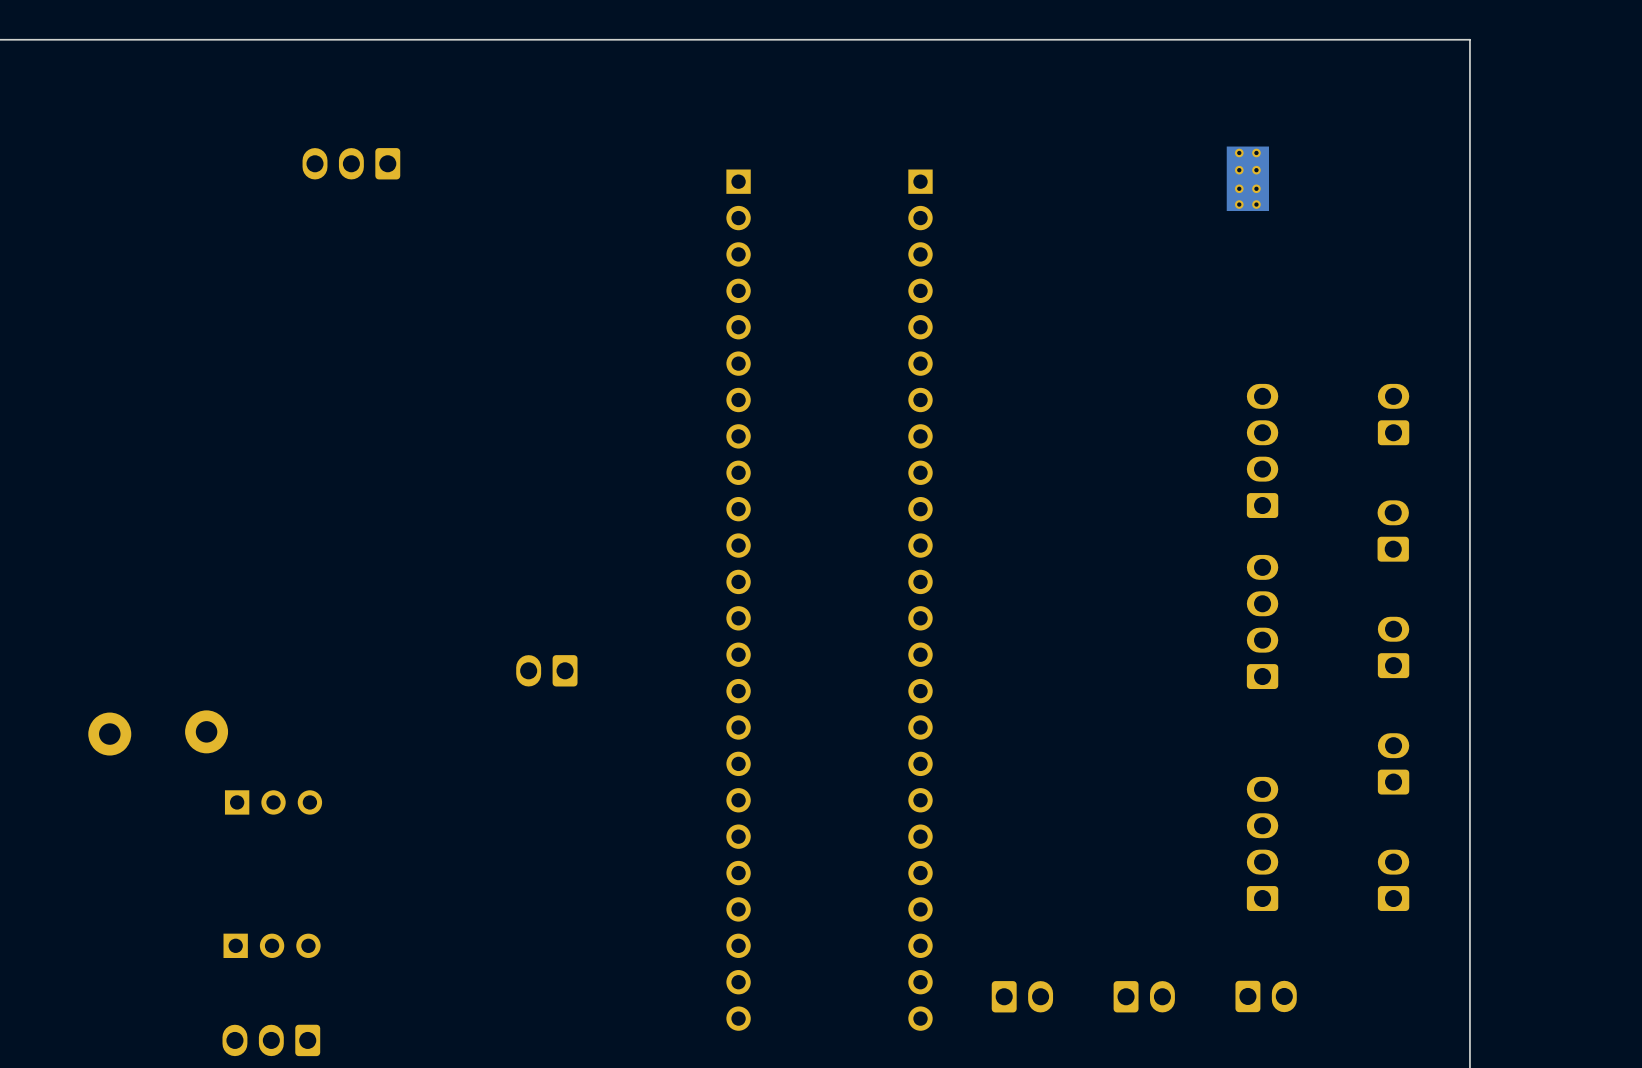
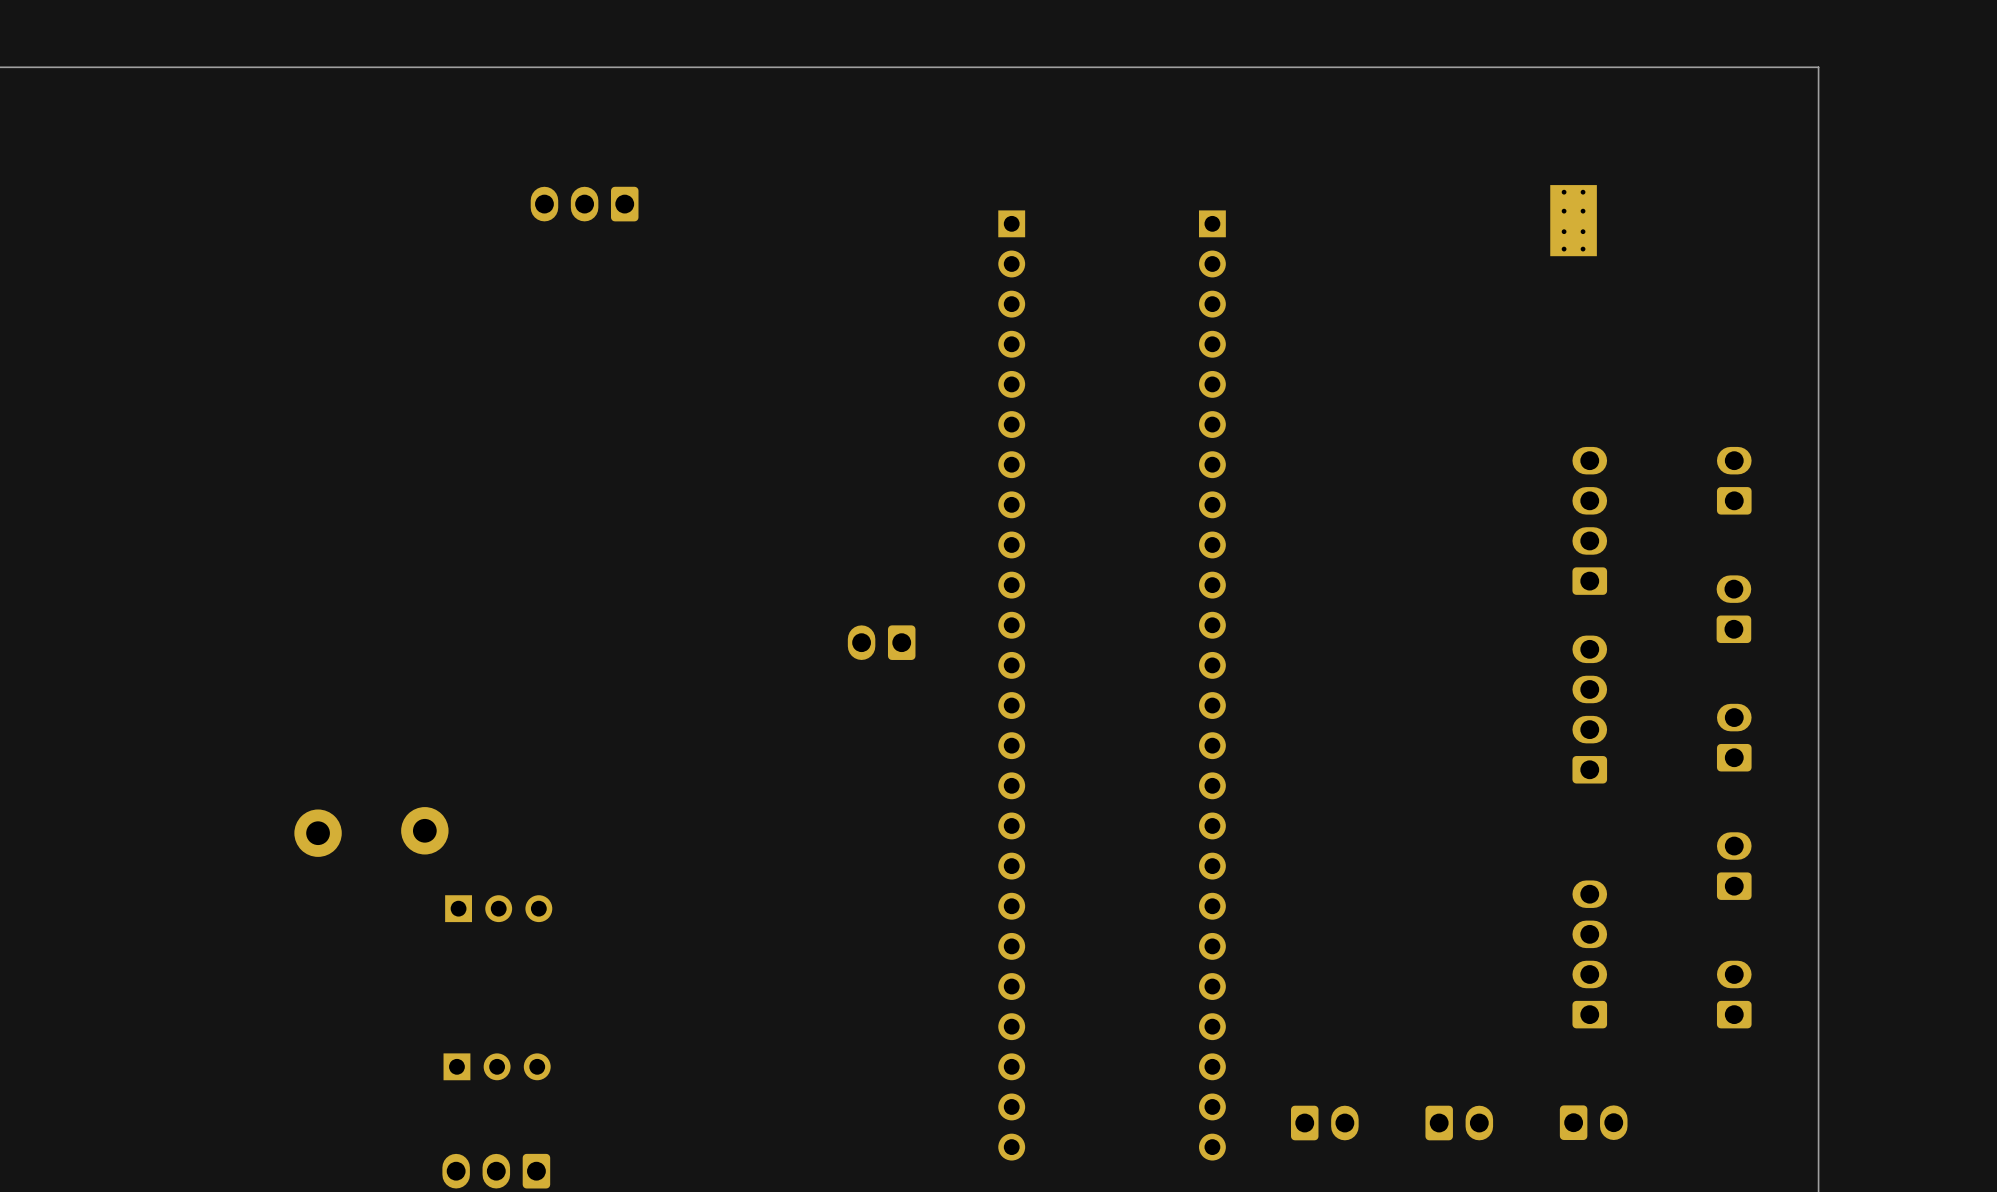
part position: (546, 670) -> (881, 642)

